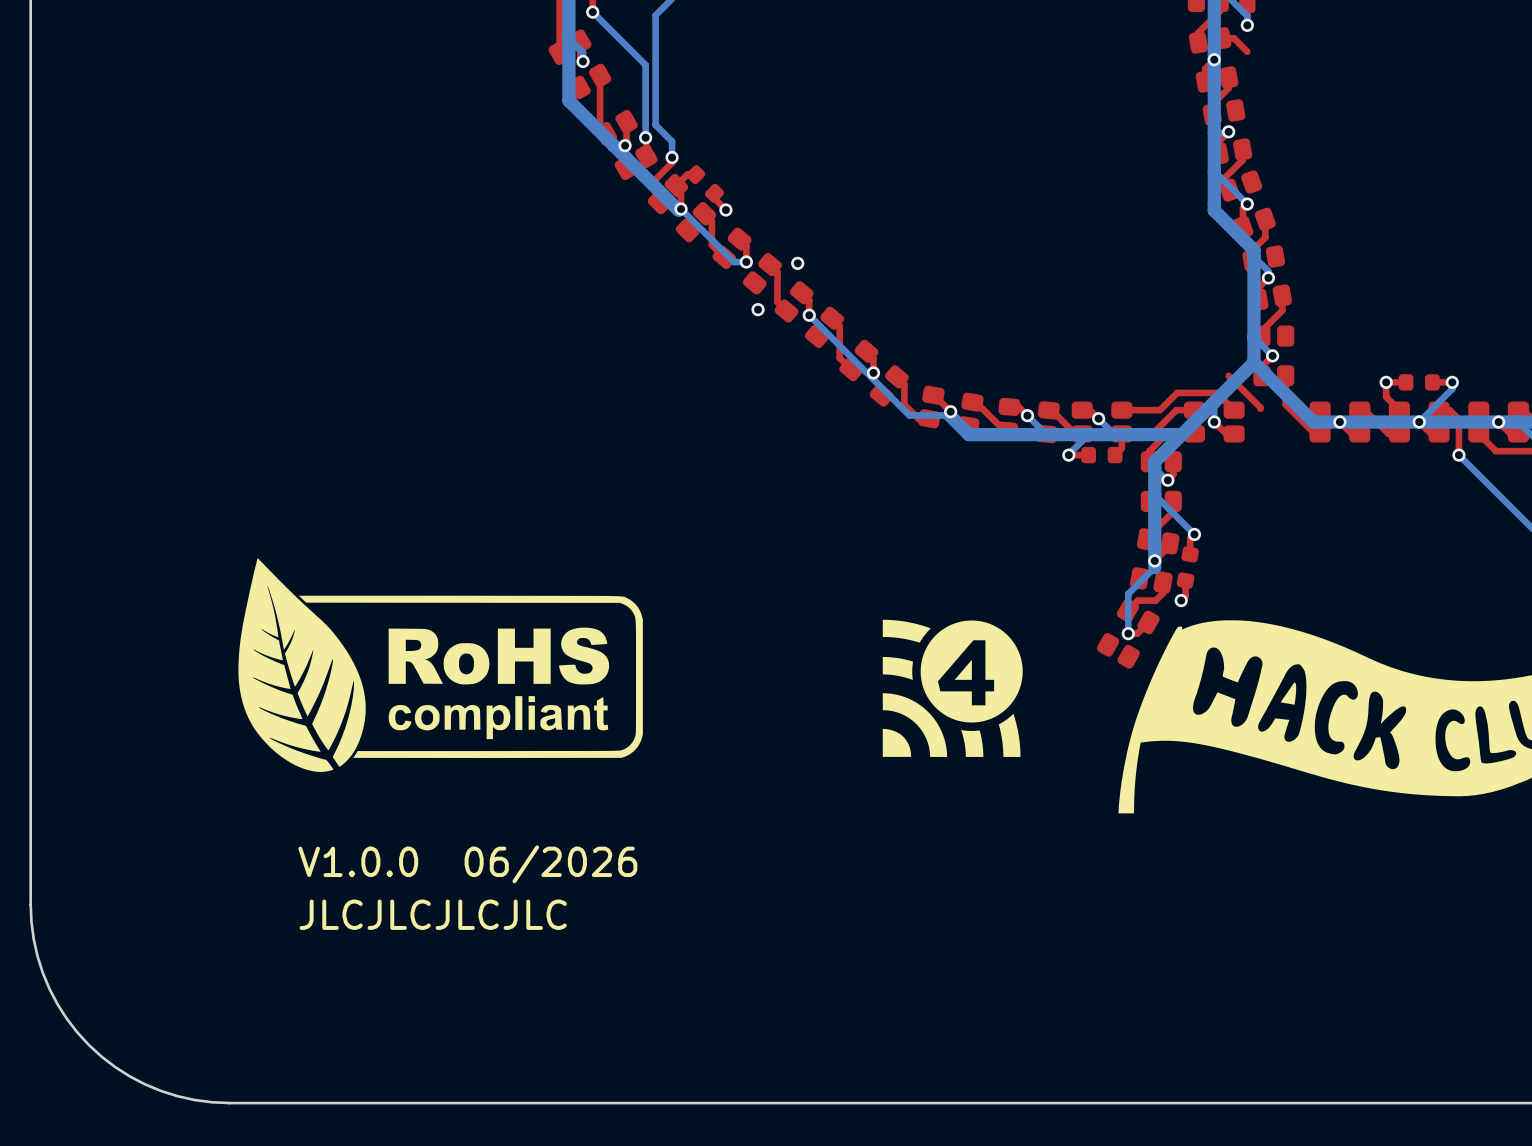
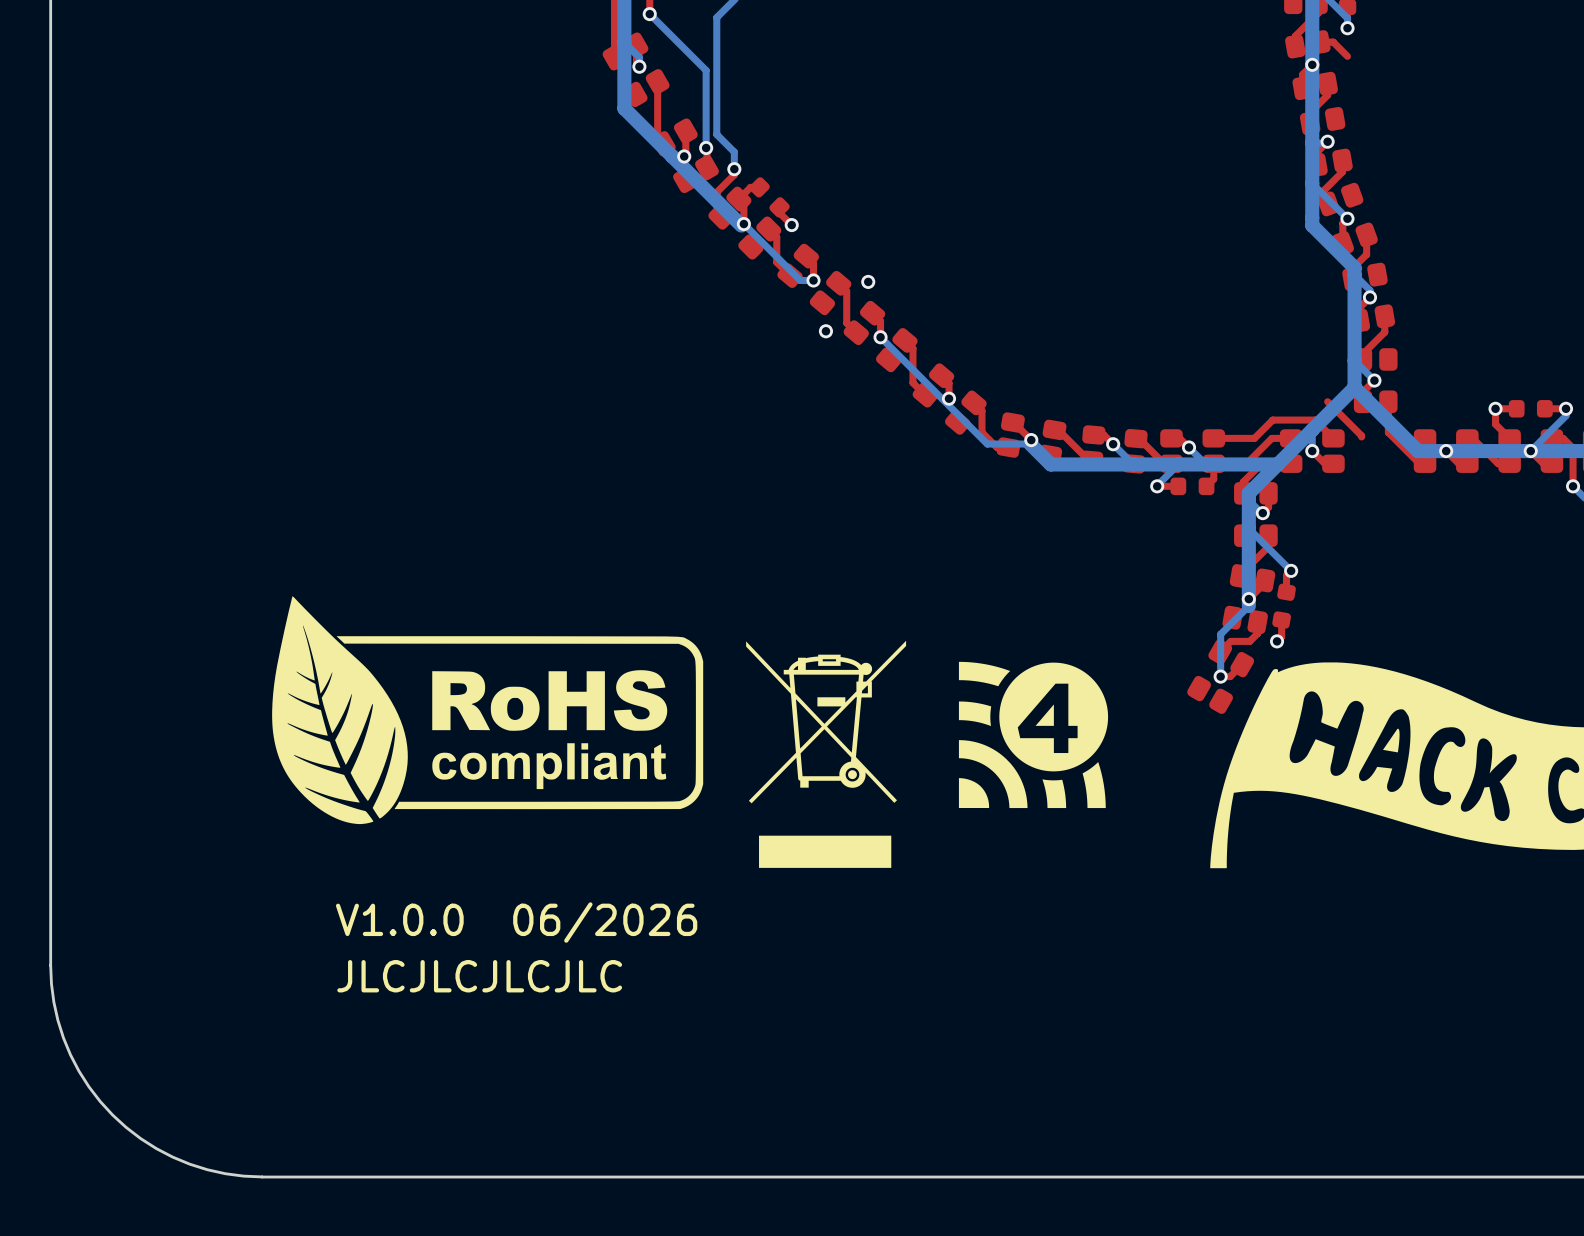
drawing: none -> [746, 640, 907, 868]

